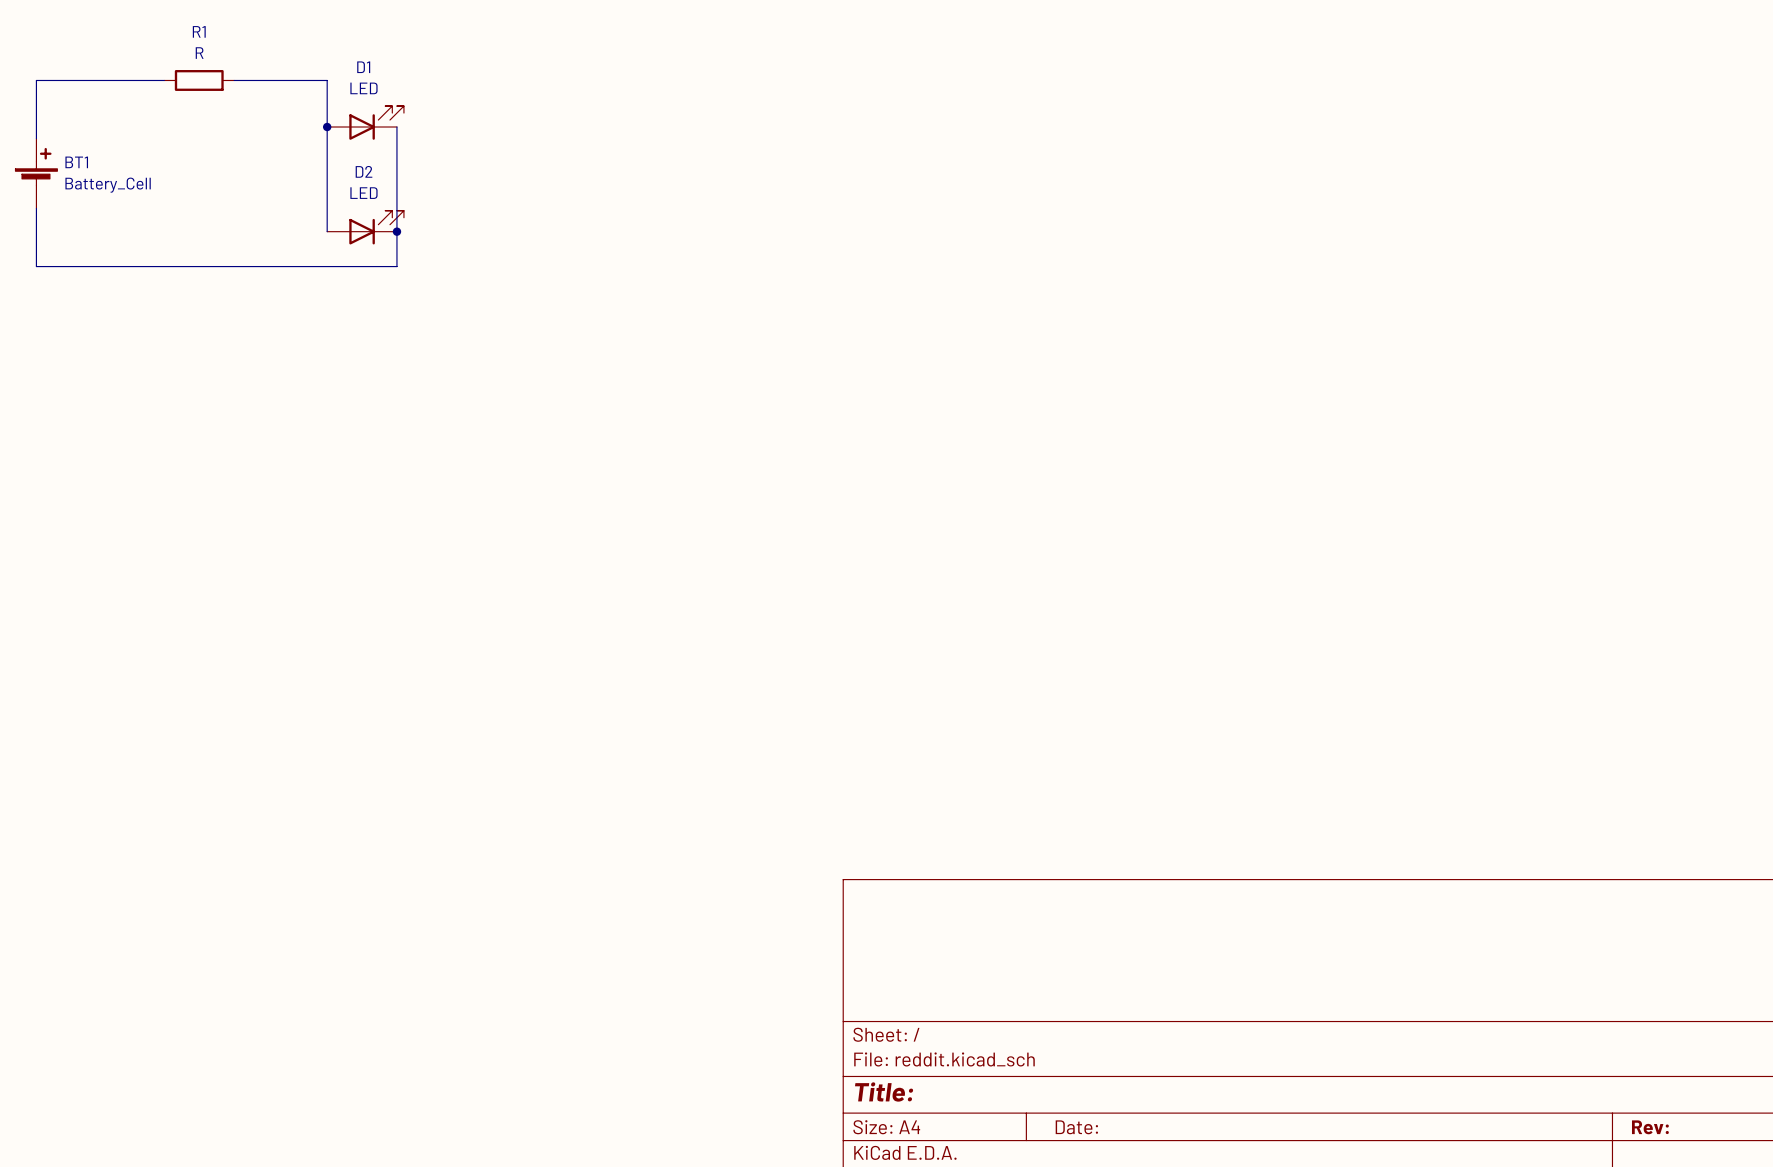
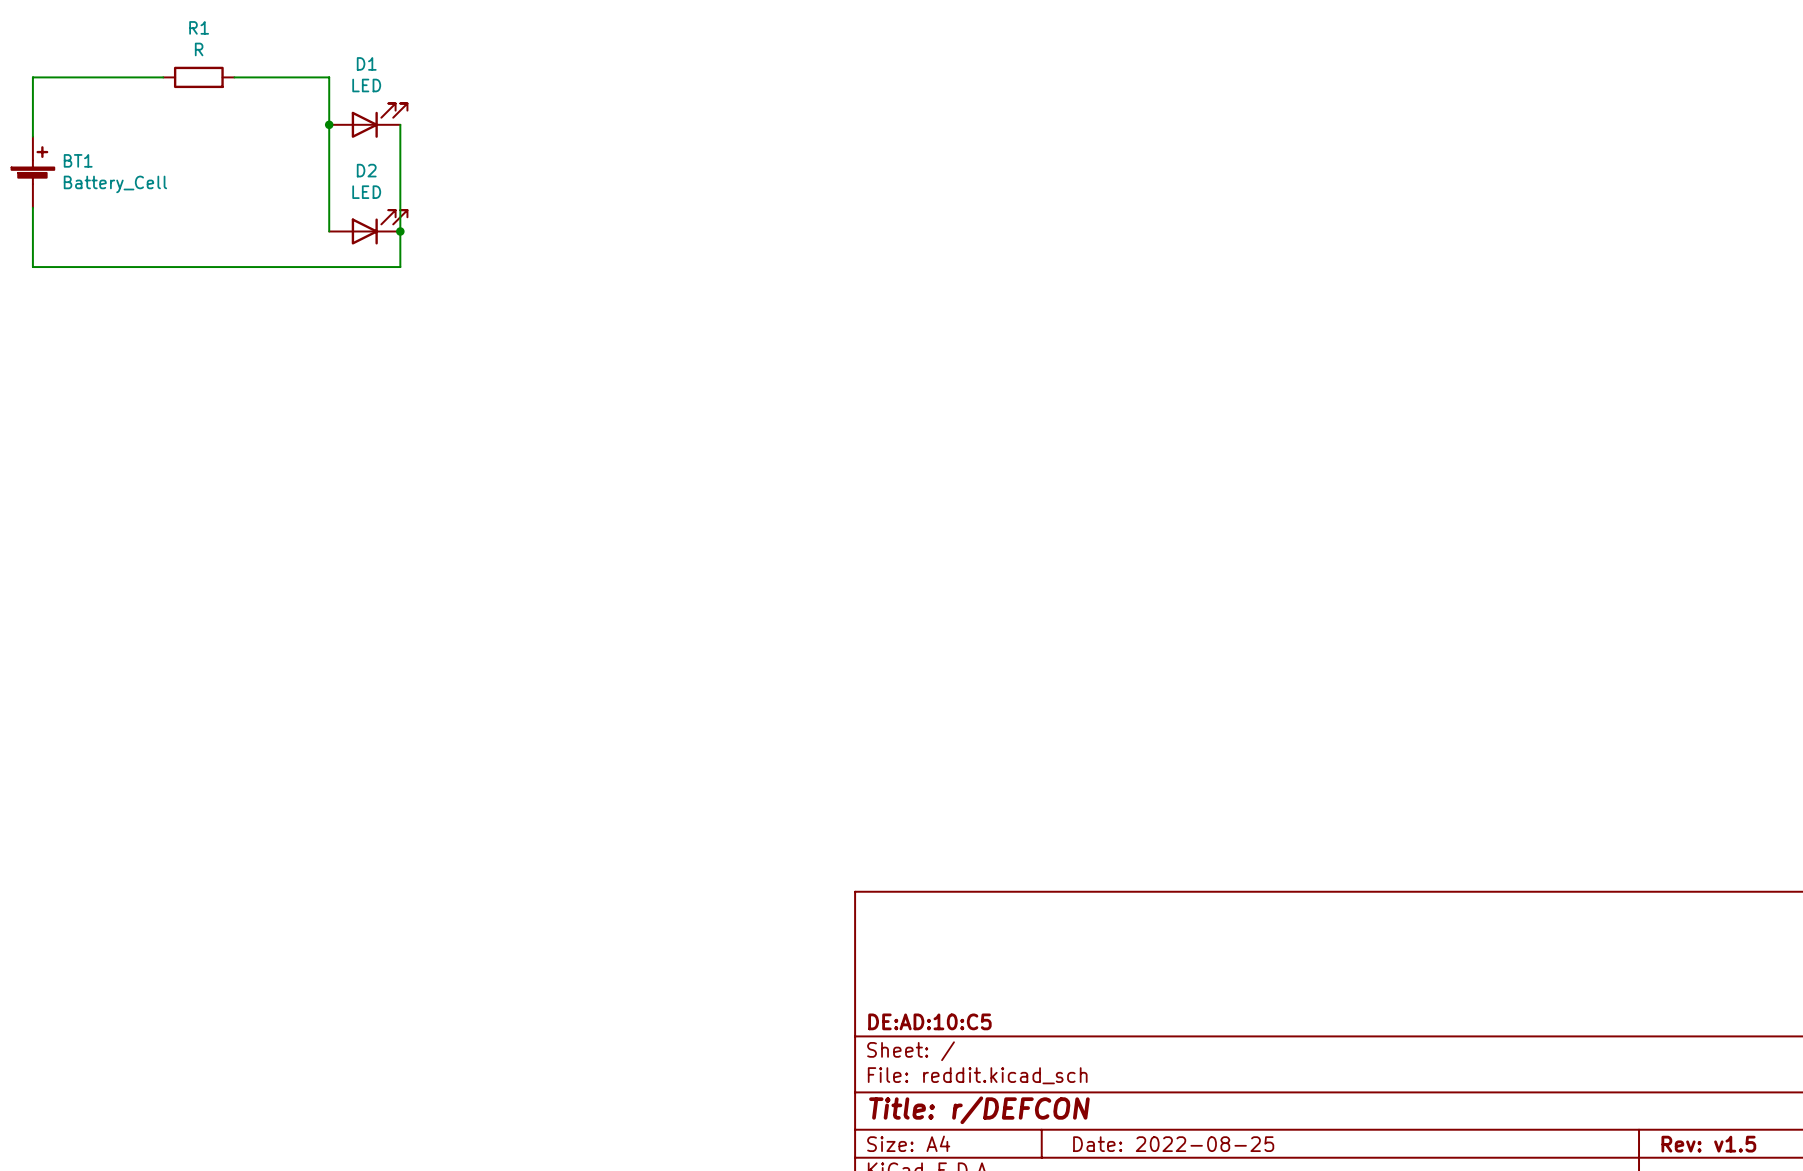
title block: none -> DE:AD:10:C5 (929, 1021)
title block: Title: (884, 1091) -> Title: r/DEFCON (979, 1110)
title block: Date: (1076, 1127) -> Date: 2022-08-25 (1173, 1144)
title block: Rev: (1650, 1127) -> Rev: v1.5 (1708, 1144)

